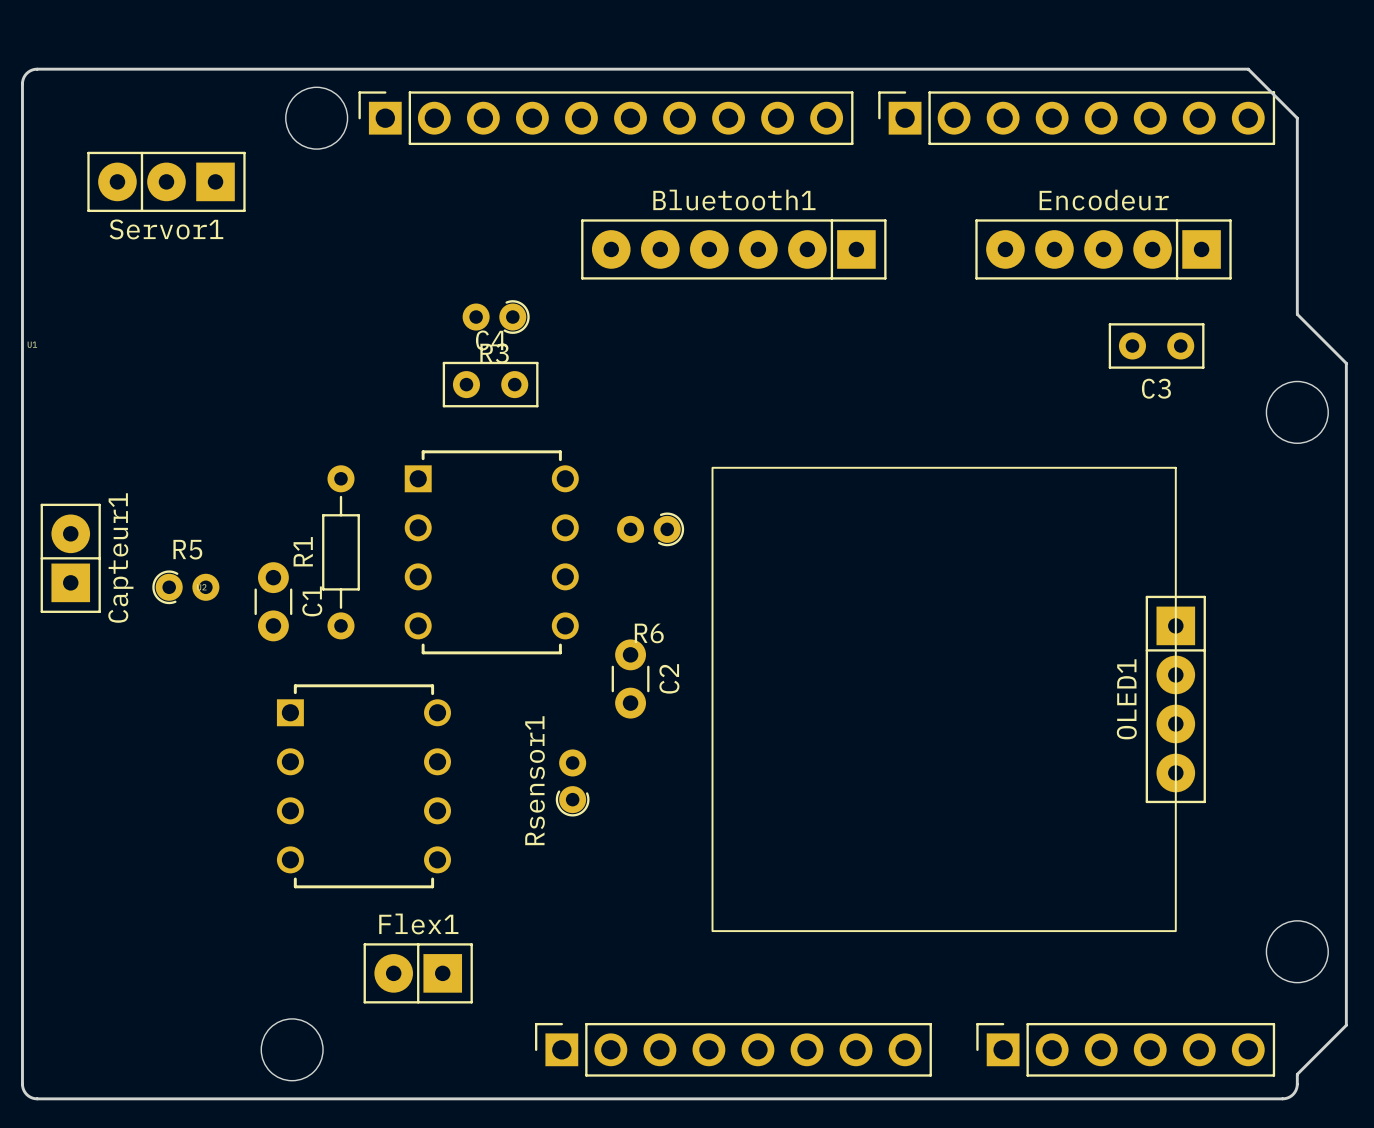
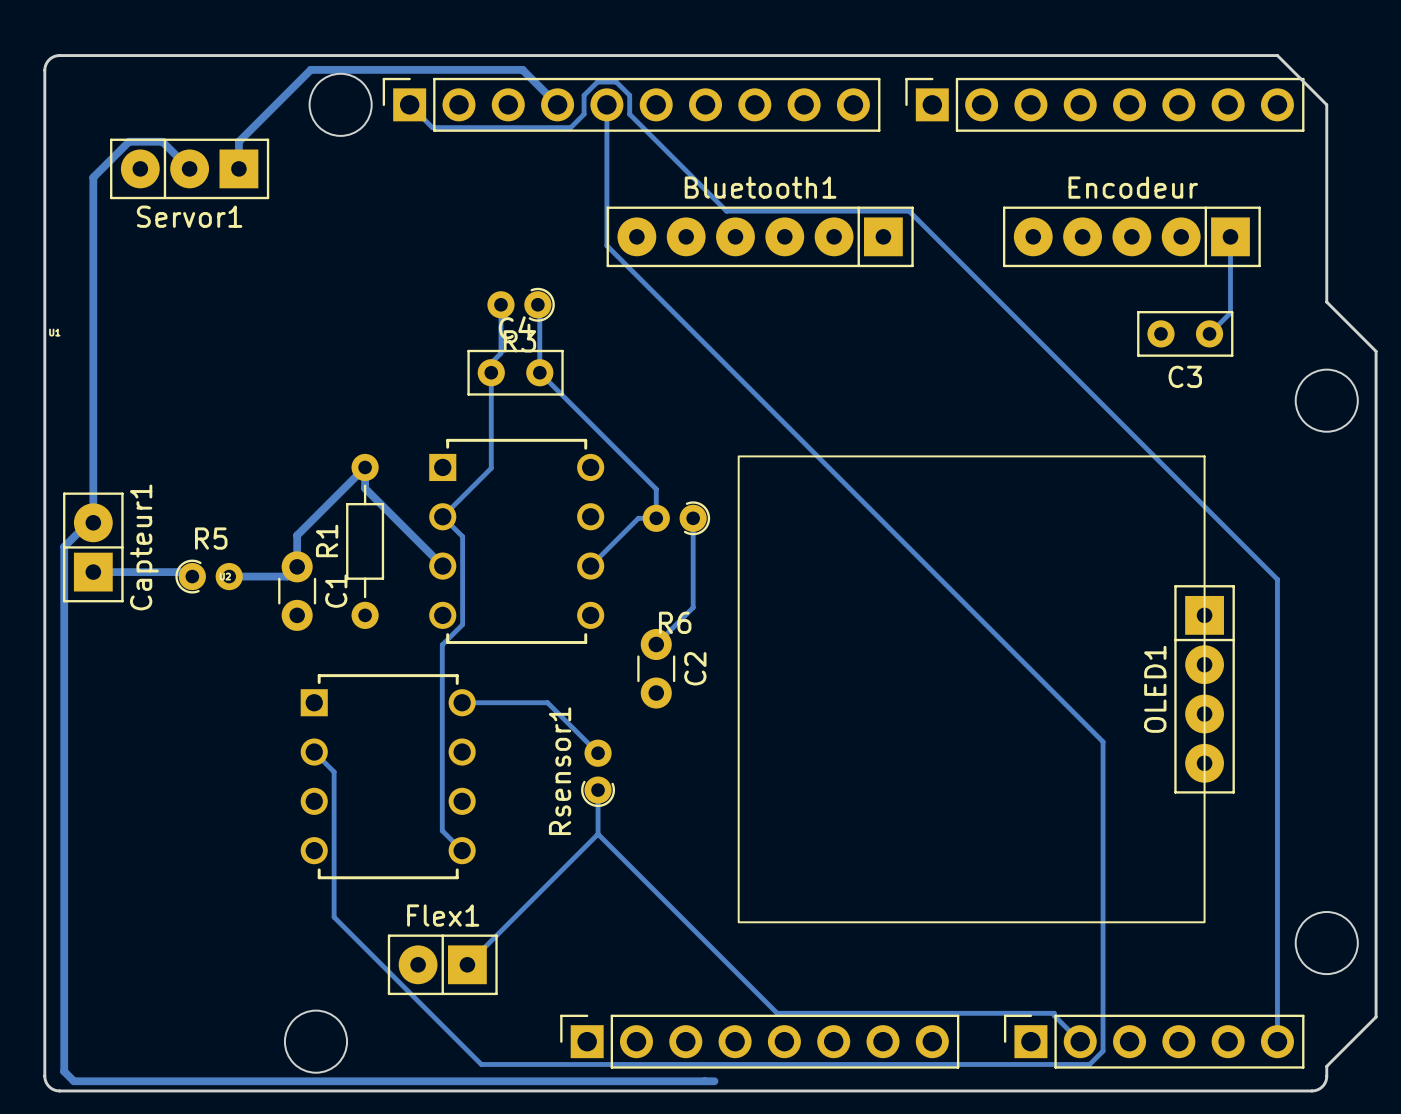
bottom track: none -> (409, 104) (432, 127) (570, 127) (584, 114) (584, 95) (597, 82) (616, 82) (629, 95) (629, 114) (726, 211) (909, 211) (1277, 579) (1277, 1041)
bottom track: none -> (557, 104) (522, 69) (310, 69) (238, 141) (238, 168)
bottom track: none -> (606, 104) (606, 245) (1103, 741) (1103, 1051) (1089, 1064) (481, 1064) (334, 917) (334, 771) (314, 752)
bottom track: none -> (189, 168) (162, 141) (129, 141) (93, 177) (93, 522) (88, 522) (64, 546) (64, 1071) (73, 1081) (714, 1081)
bottom track: none -> (1230, 236) (1230, 312) (1209, 333)
bottom track: none -> (500, 304) (500, 353) (491, 363) (491, 468) (442, 516) (462, 536) (462, 624) (442, 644) (442, 830) (462, 850)
bottom track: none -> (537, 304) (539, 306) (539, 372) (656, 489) (656, 518) (638, 518) (590, 566)
bottom track: none -> (693, 518) (693, 607) (656, 644)
bottom track: none -> (442, 566) (365, 488) (365, 467) (297, 535) (297, 566) (287, 576) (229, 576)
bottom track: none -> (93, 572) (187, 572) (192, 576)
bottom track: none -> (462, 702) (547, 702) (598, 753)
bottom track: none -> (598, 790) (598, 834)
bottom track: none -> (598, 834) (777, 1013) (1054, 1013) (1054, 1015) (1080, 1041)
bottom track: none -> (598, 834) (467, 964)

